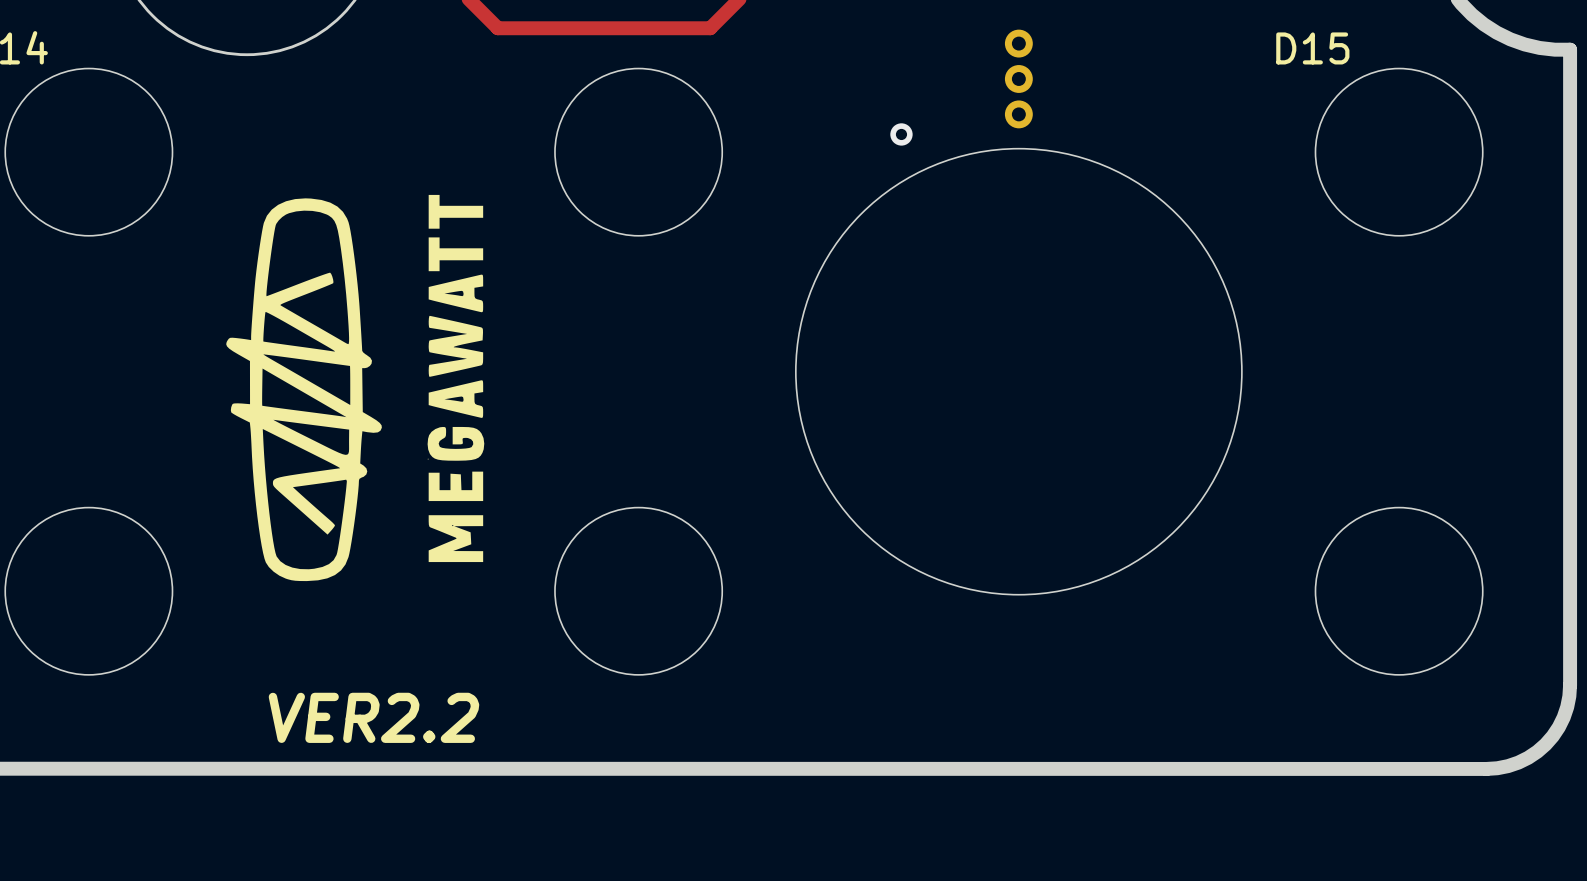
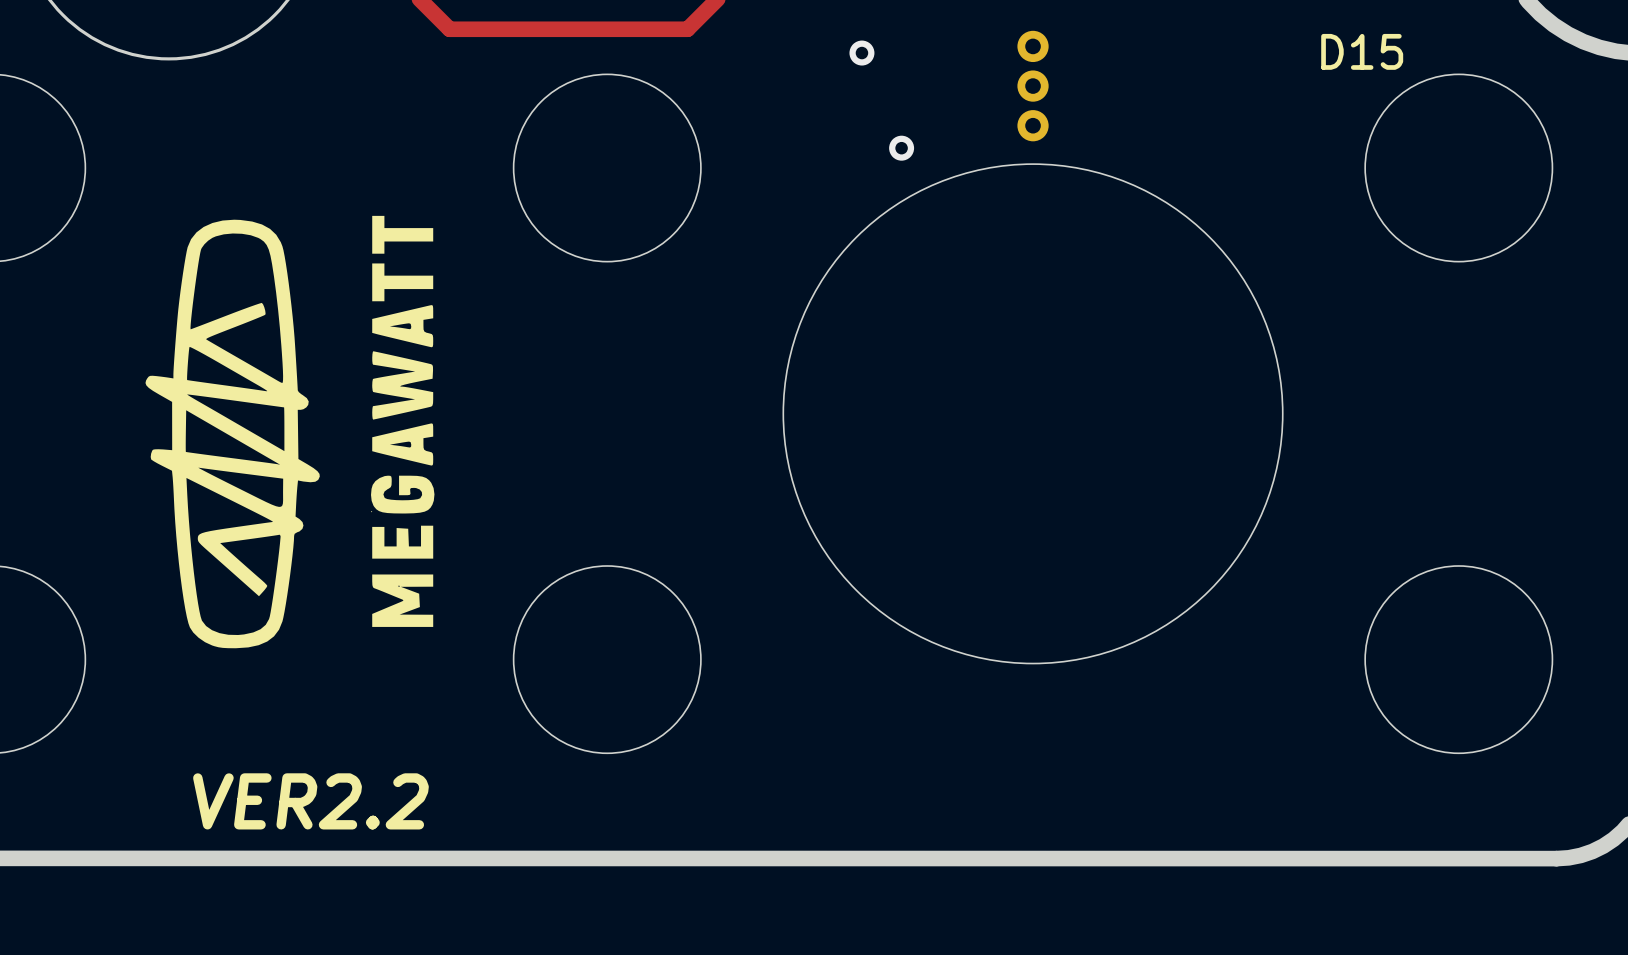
via: none -> (861, 53)

